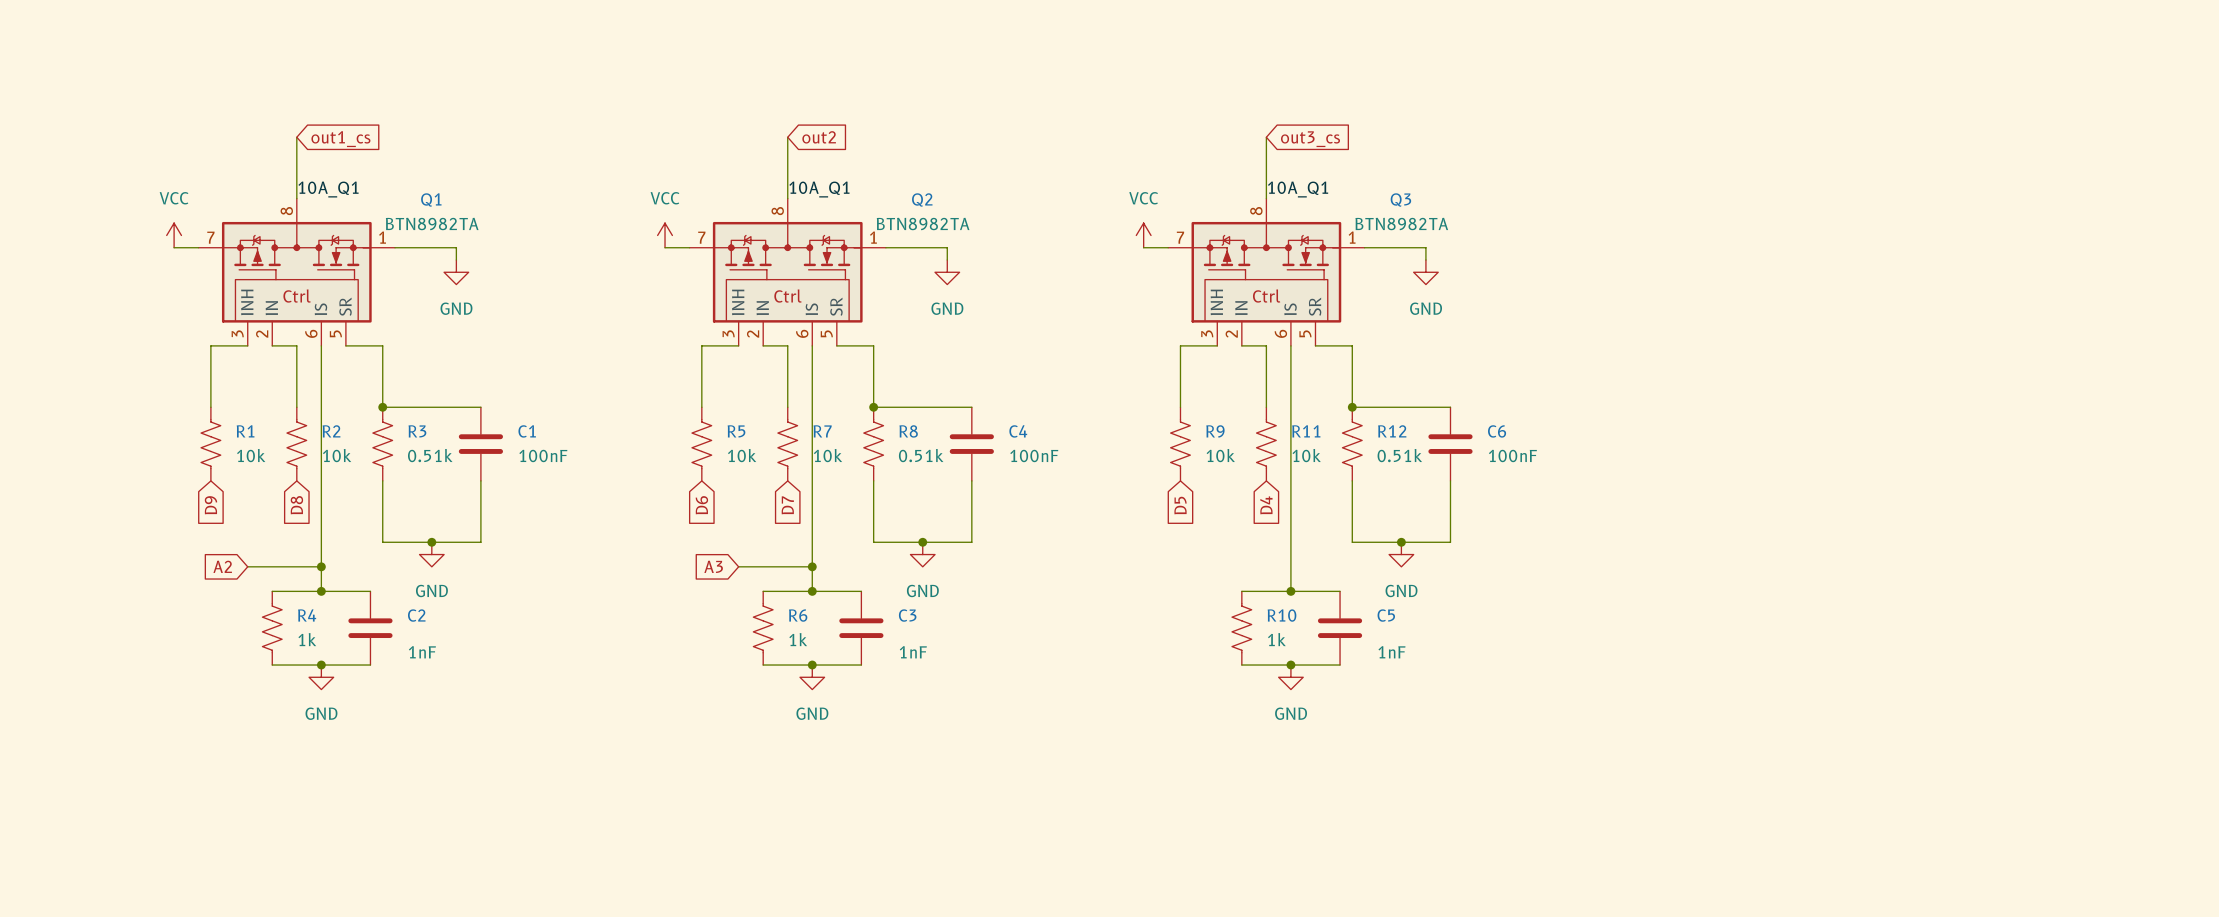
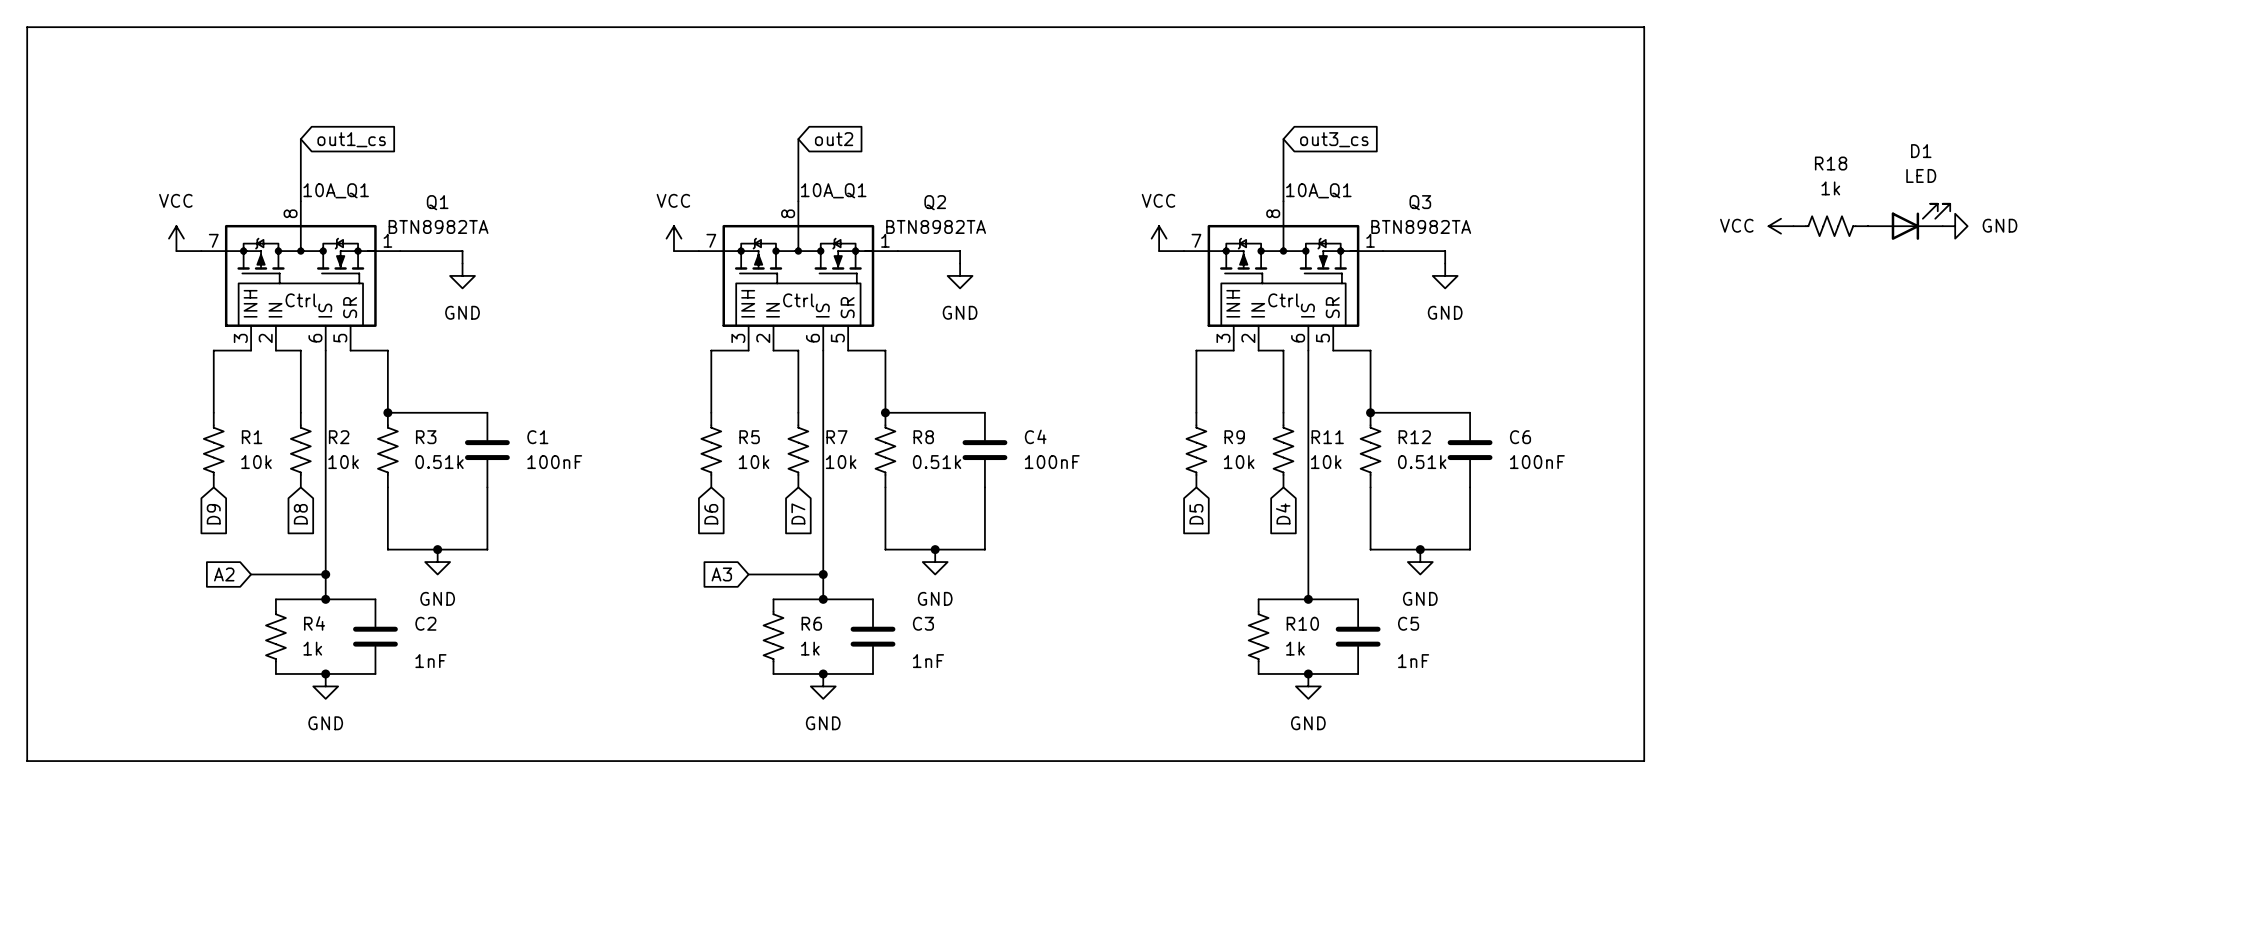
bus: none -> (27, 27) (1644, 27) (1644, 761) (27, 761) (27, 27)
D1: none -> LED (1909, 221)
power symbol: none -> VCC (1781, 226)
R18: none -> 1k (1830, 226)
power symbol: none -> GND (1955, 226)

